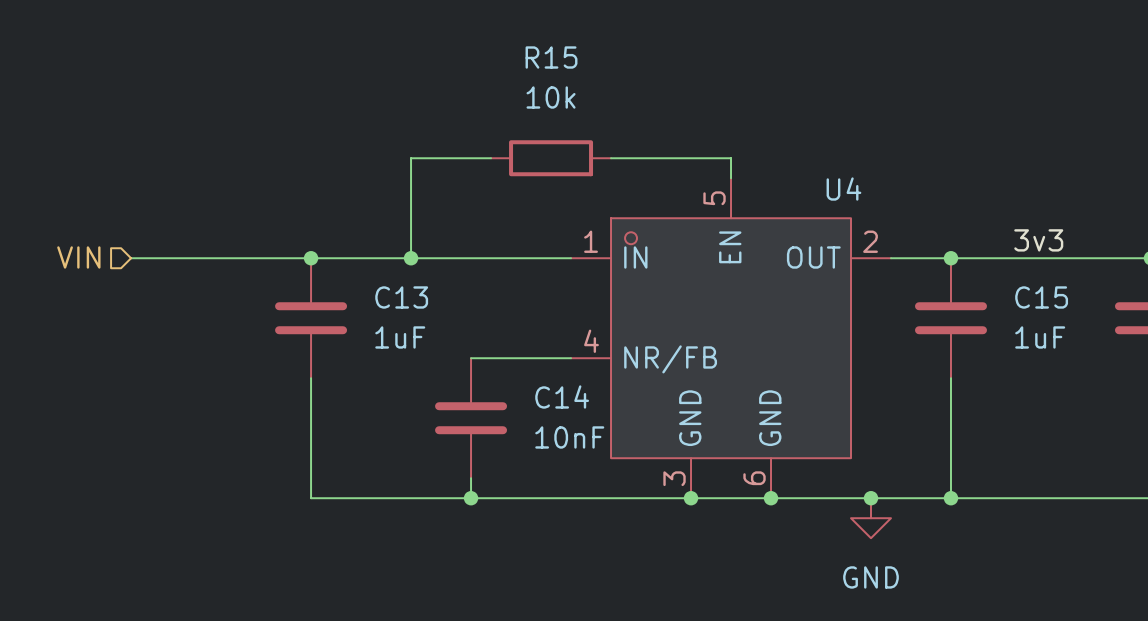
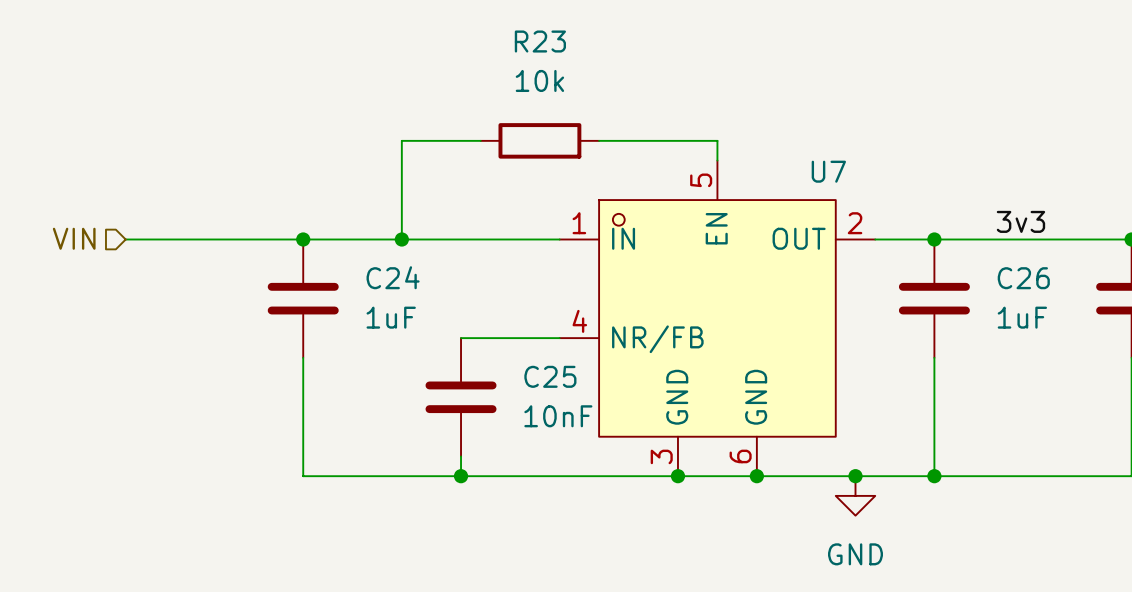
R15 name: R15 (551, 57) -> R23 (540, 41)
U4 name: U4 (843, 189) -> U7 (828, 171)
C13 name: C13 (401, 297) -> C24 (393, 277)
C15 name: C15 (1041, 297) -> C26 (1023, 278)
C14 name: C14 (562, 396) -> C25 (550, 376)

